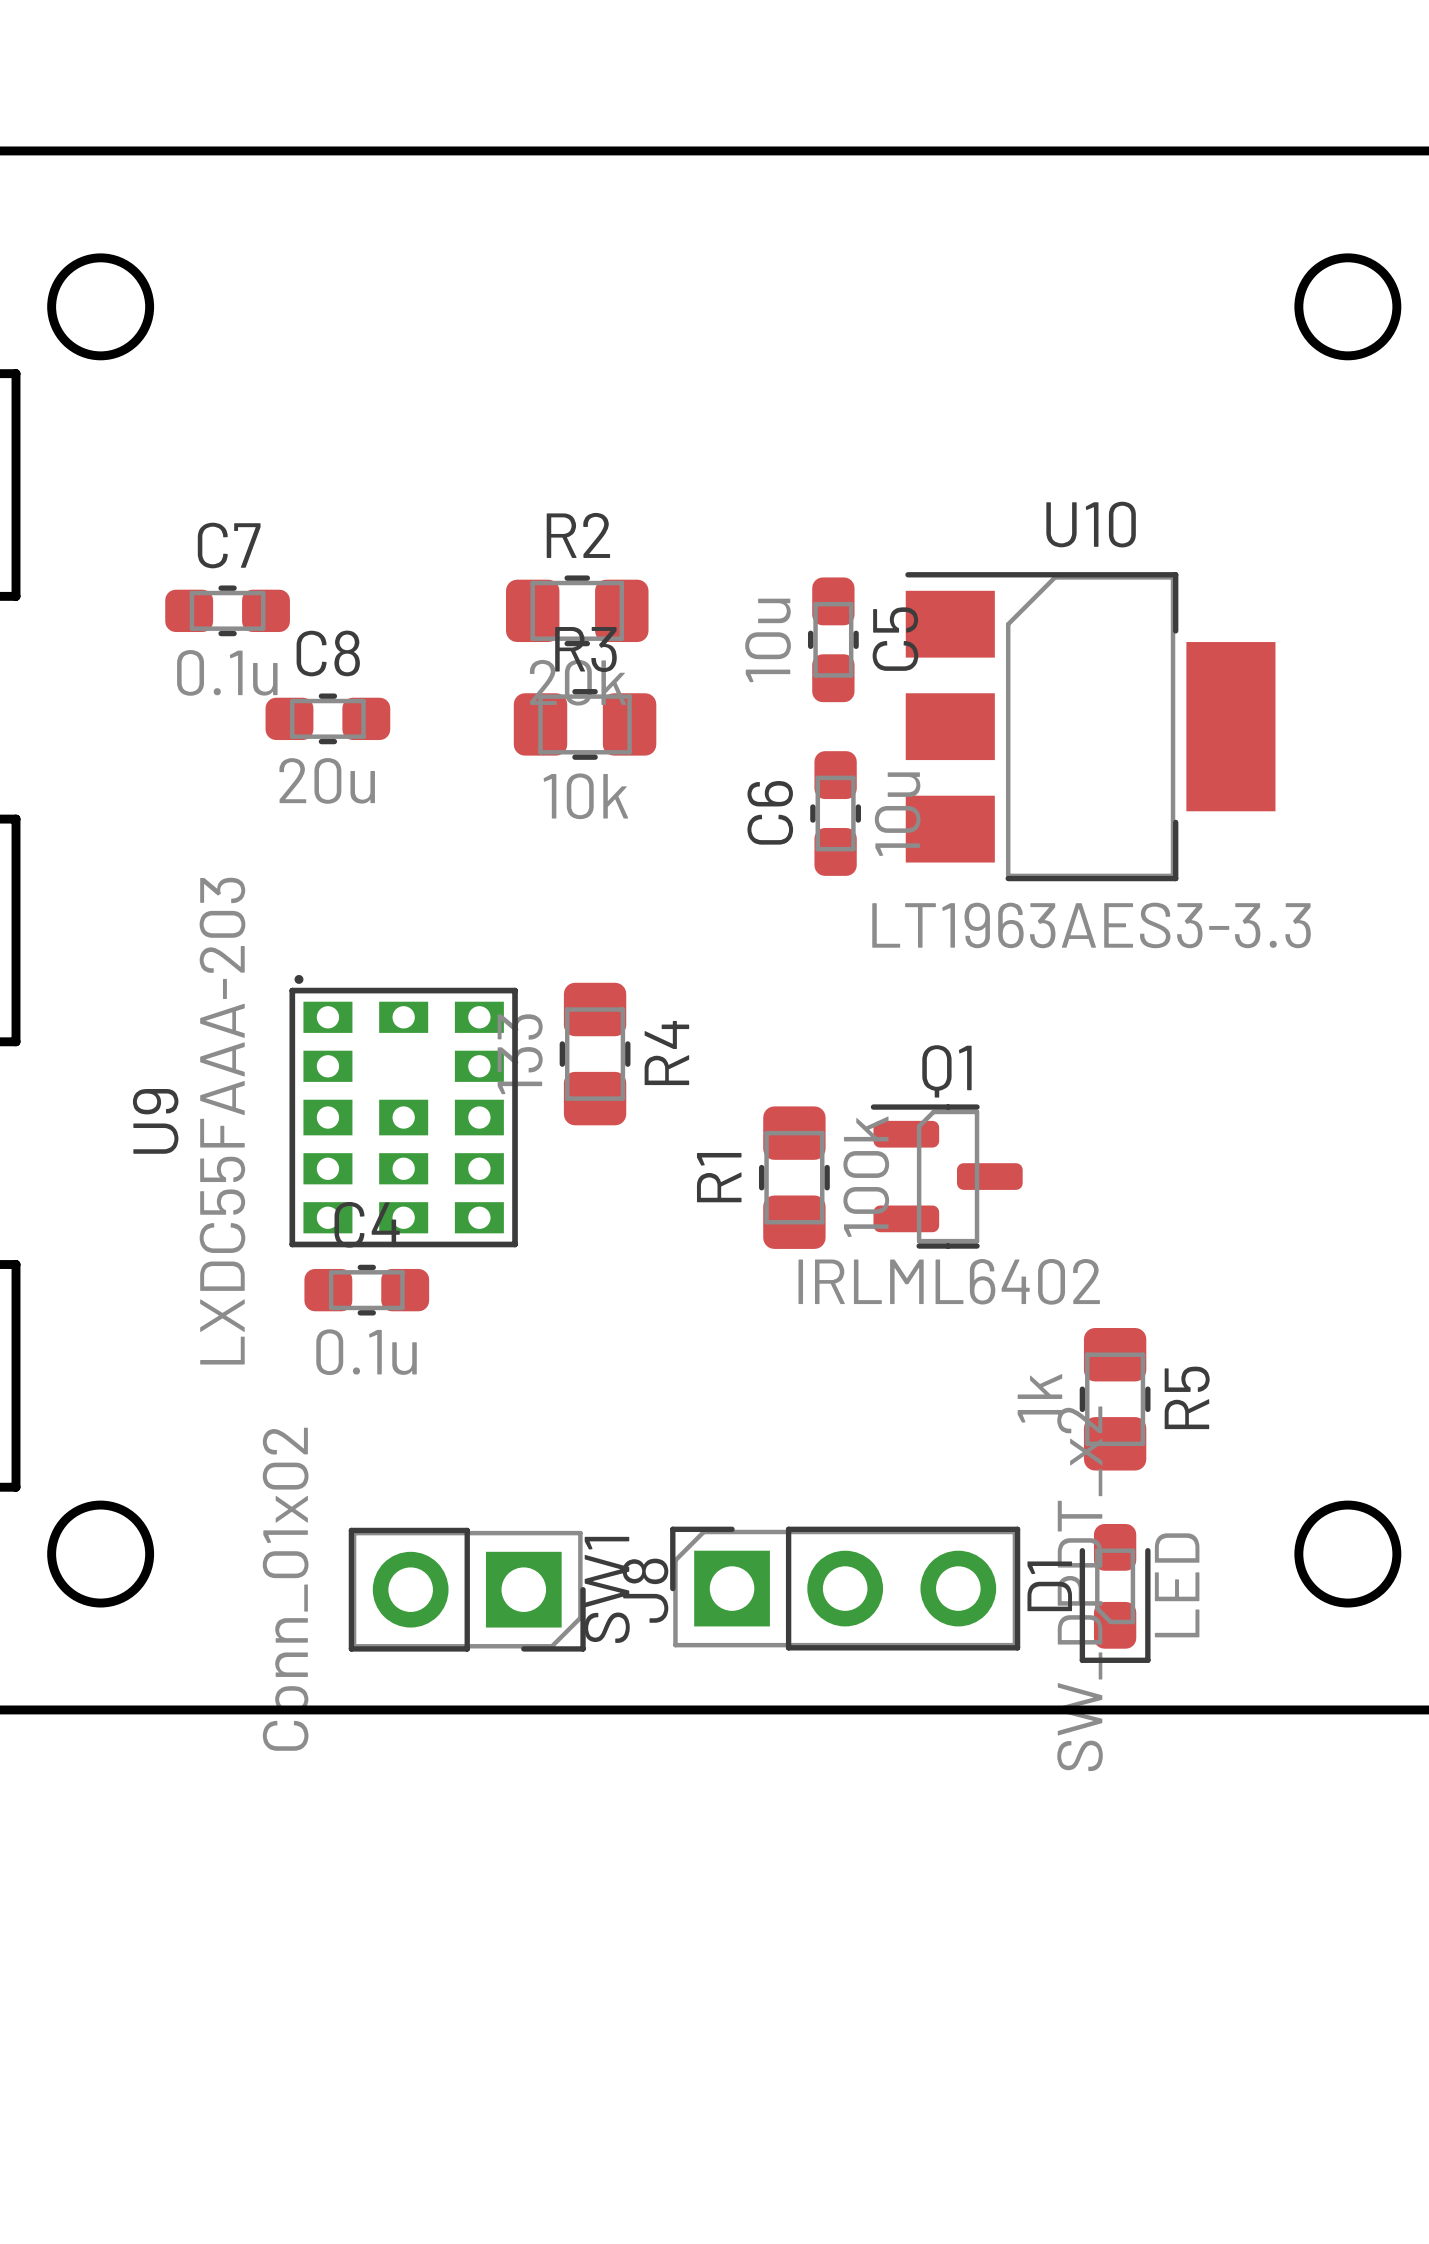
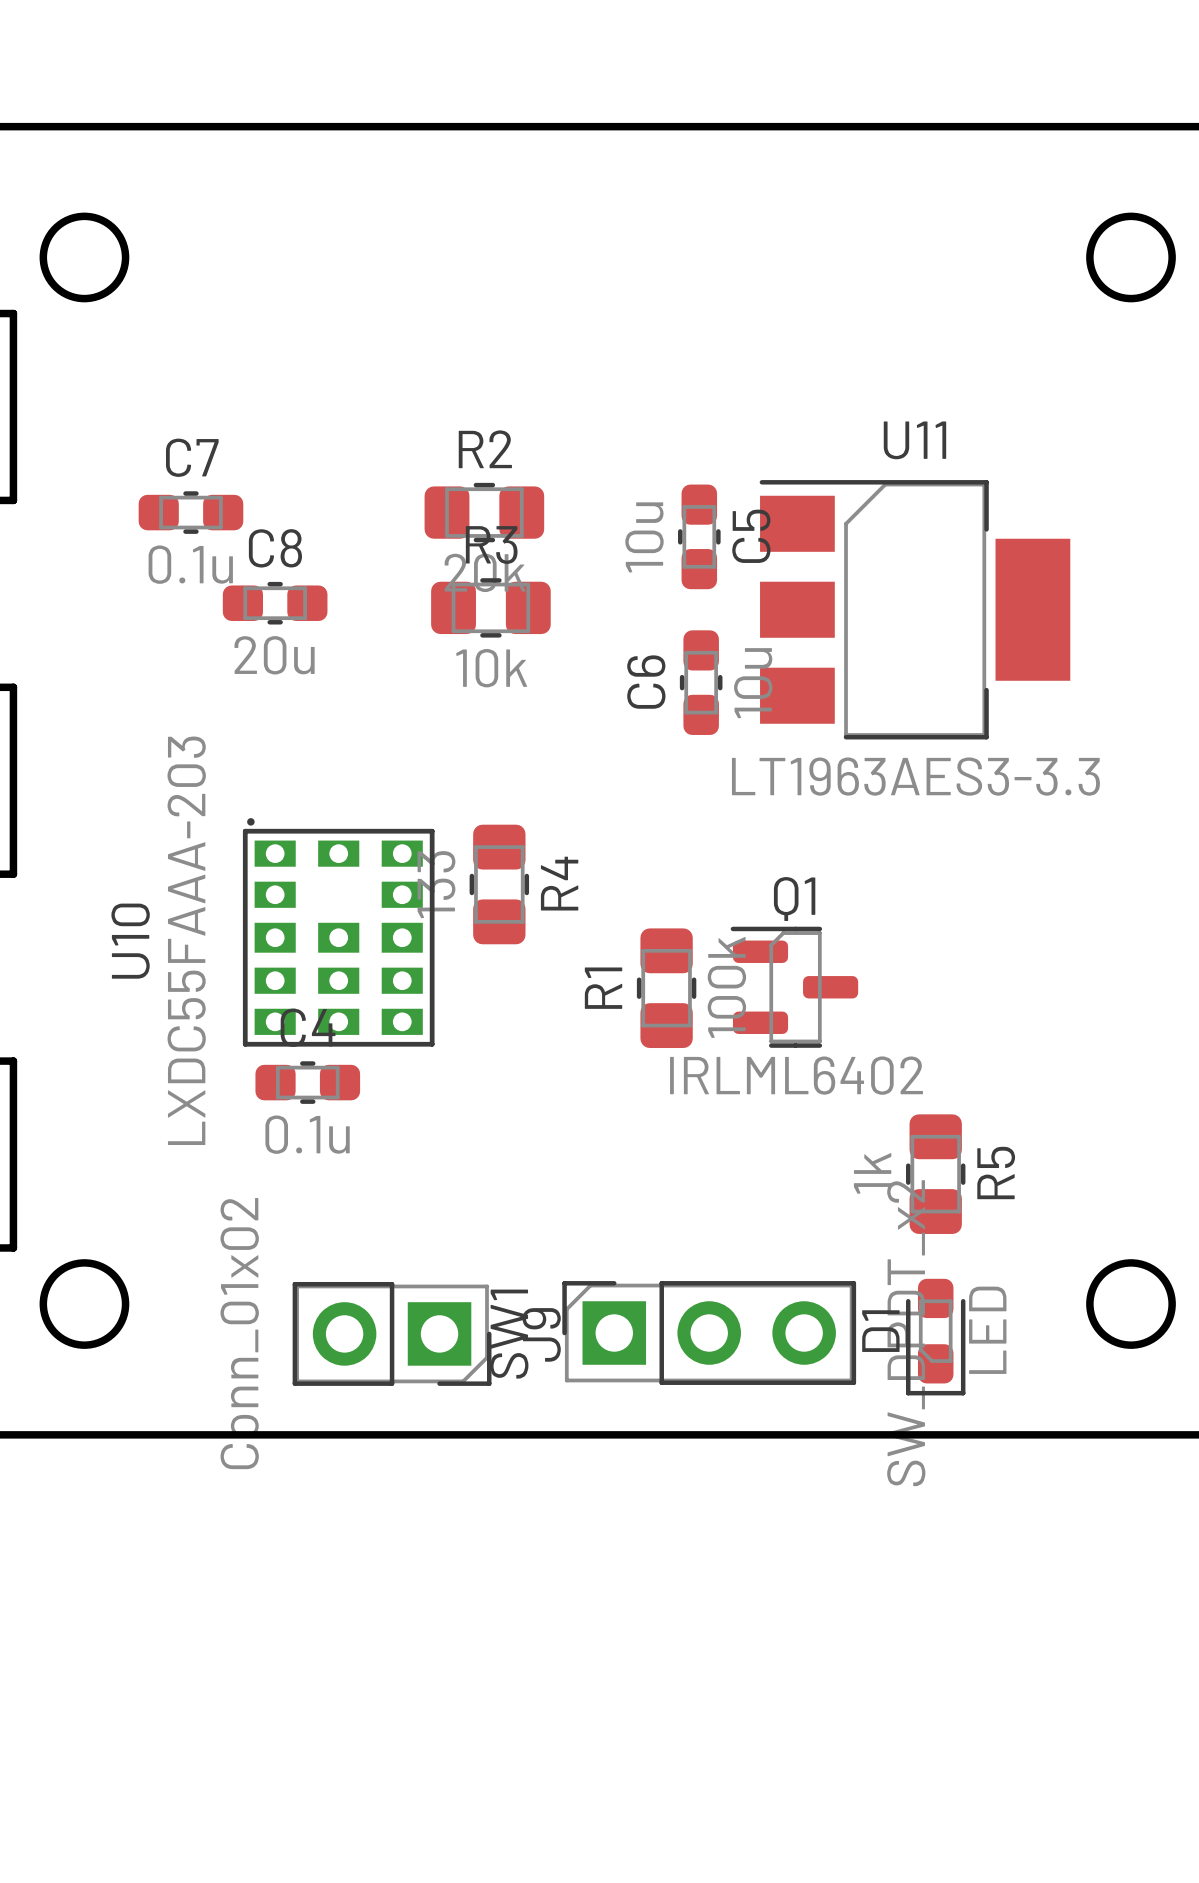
U10 name: U10 (1091, 524) -> U11 (914, 440)
U9 name: U9 (155, 1121) -> U10 (130, 941)
J8 name: J8 (645, 1590) -> J9 (541, 1334)

